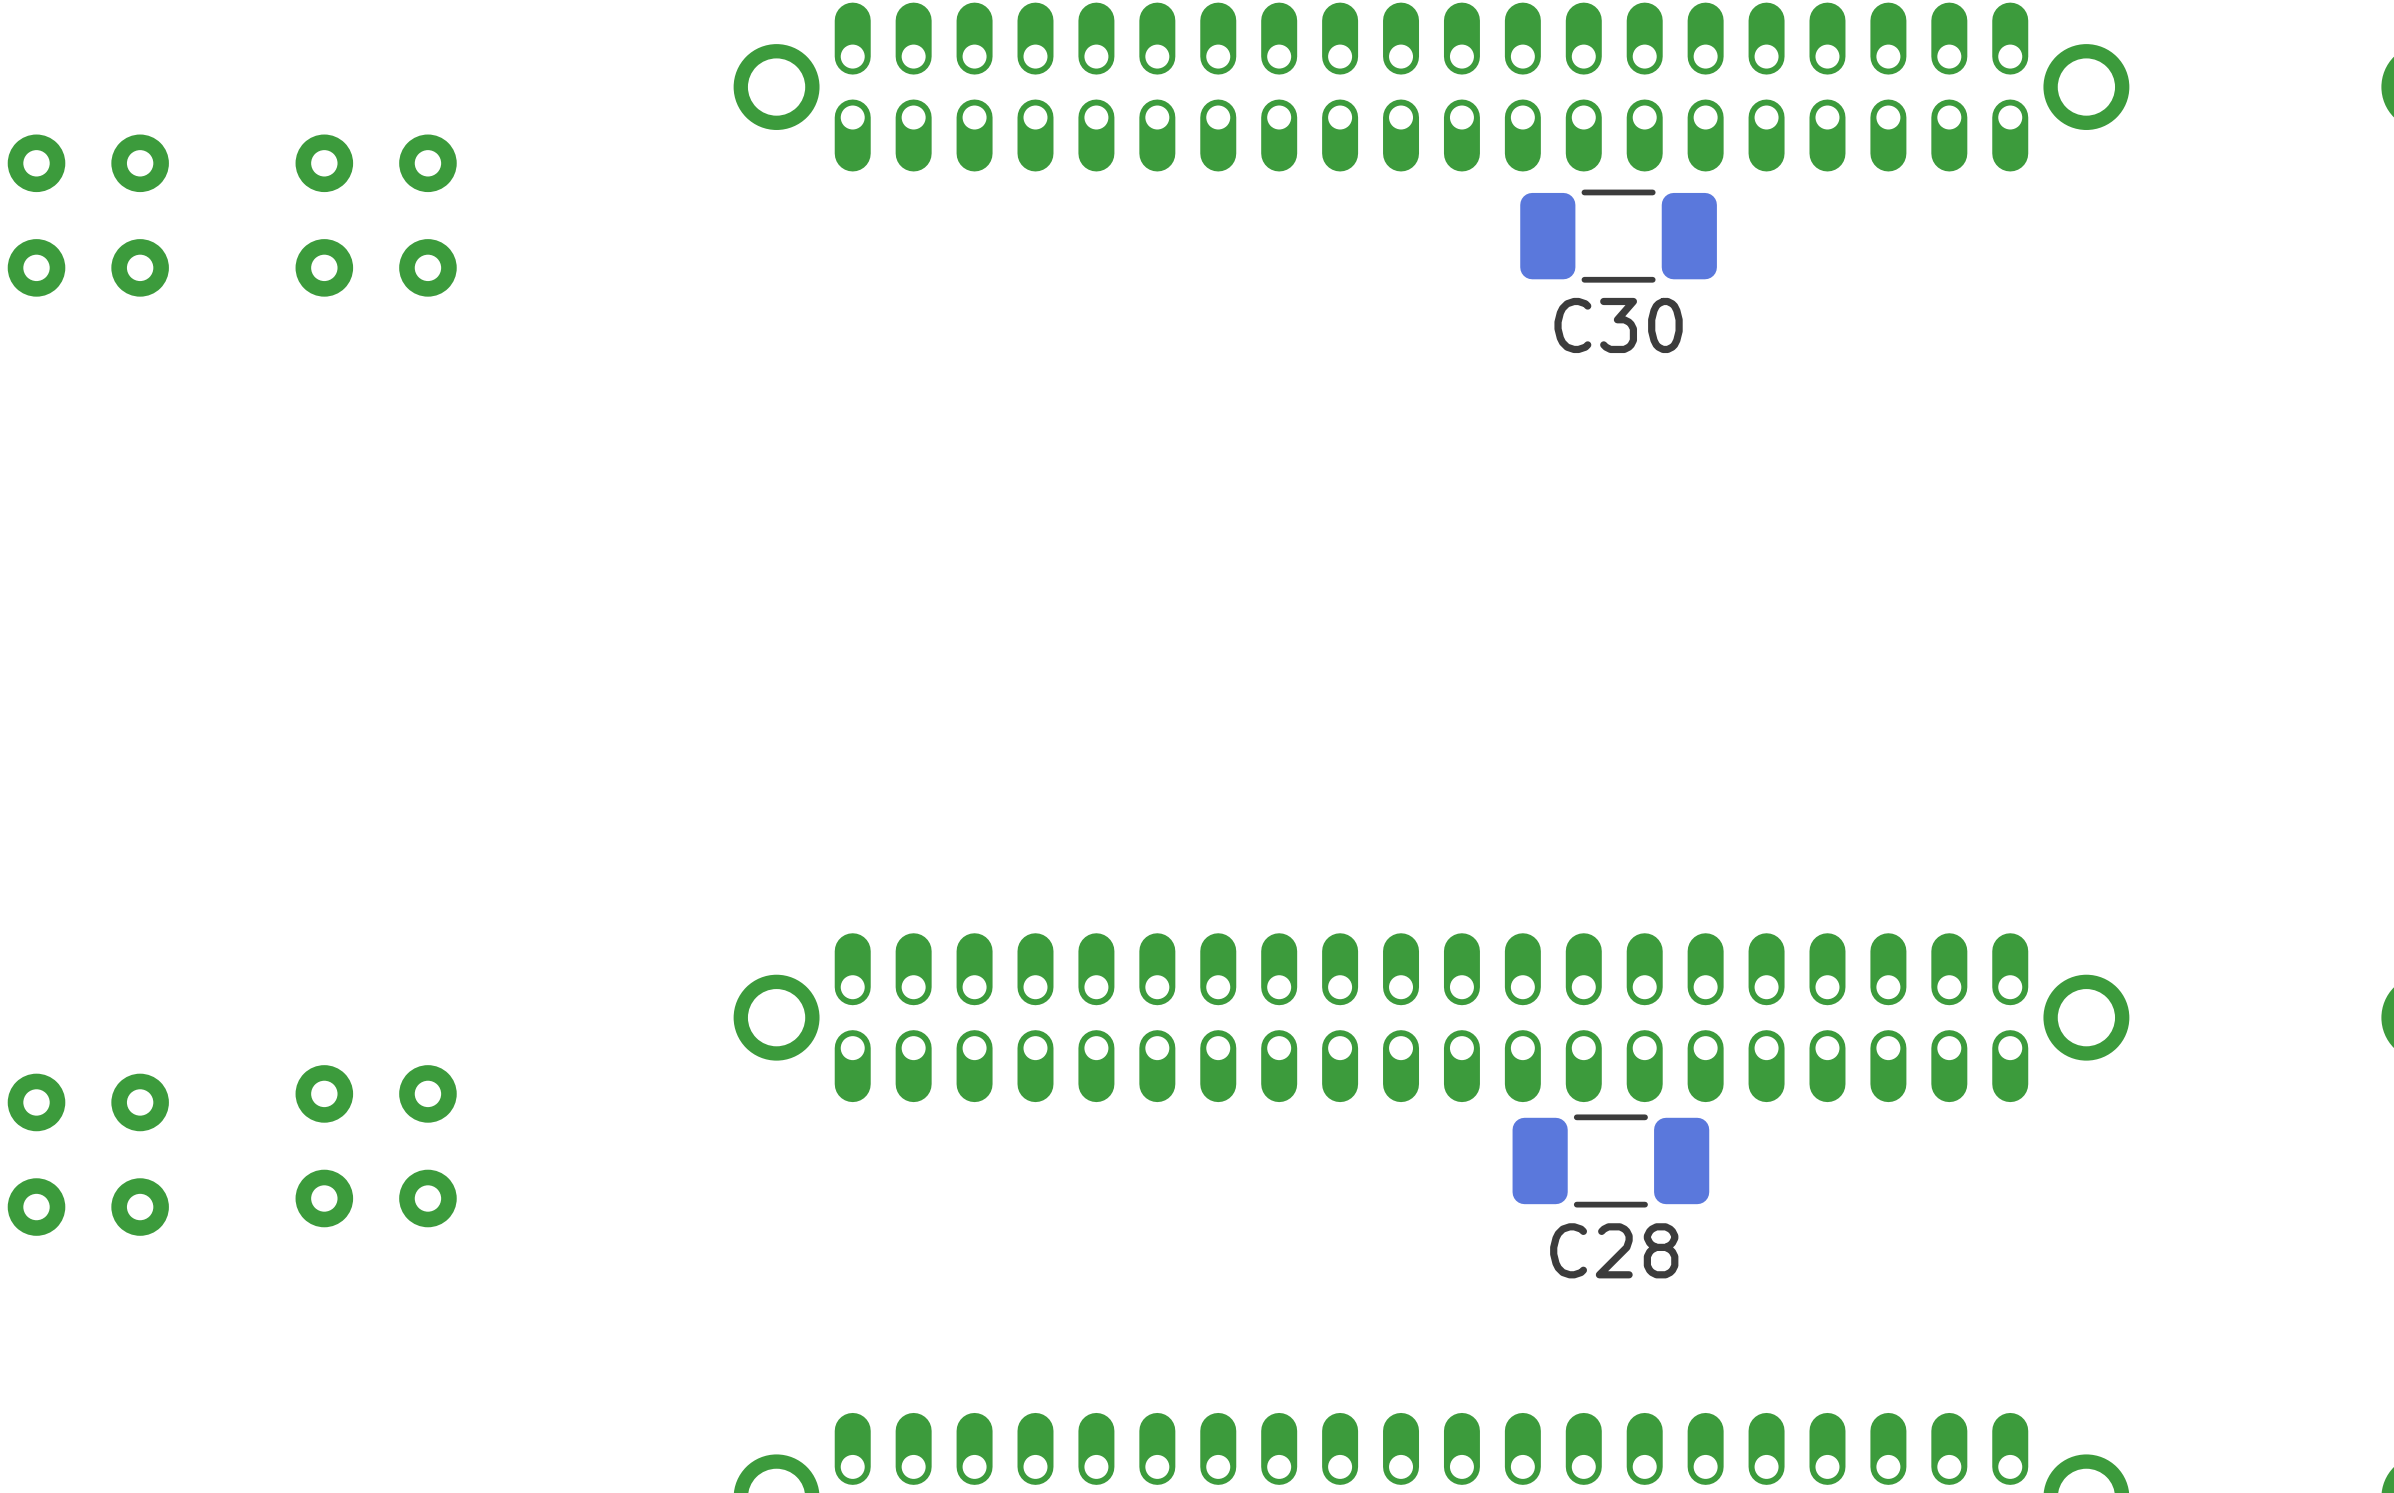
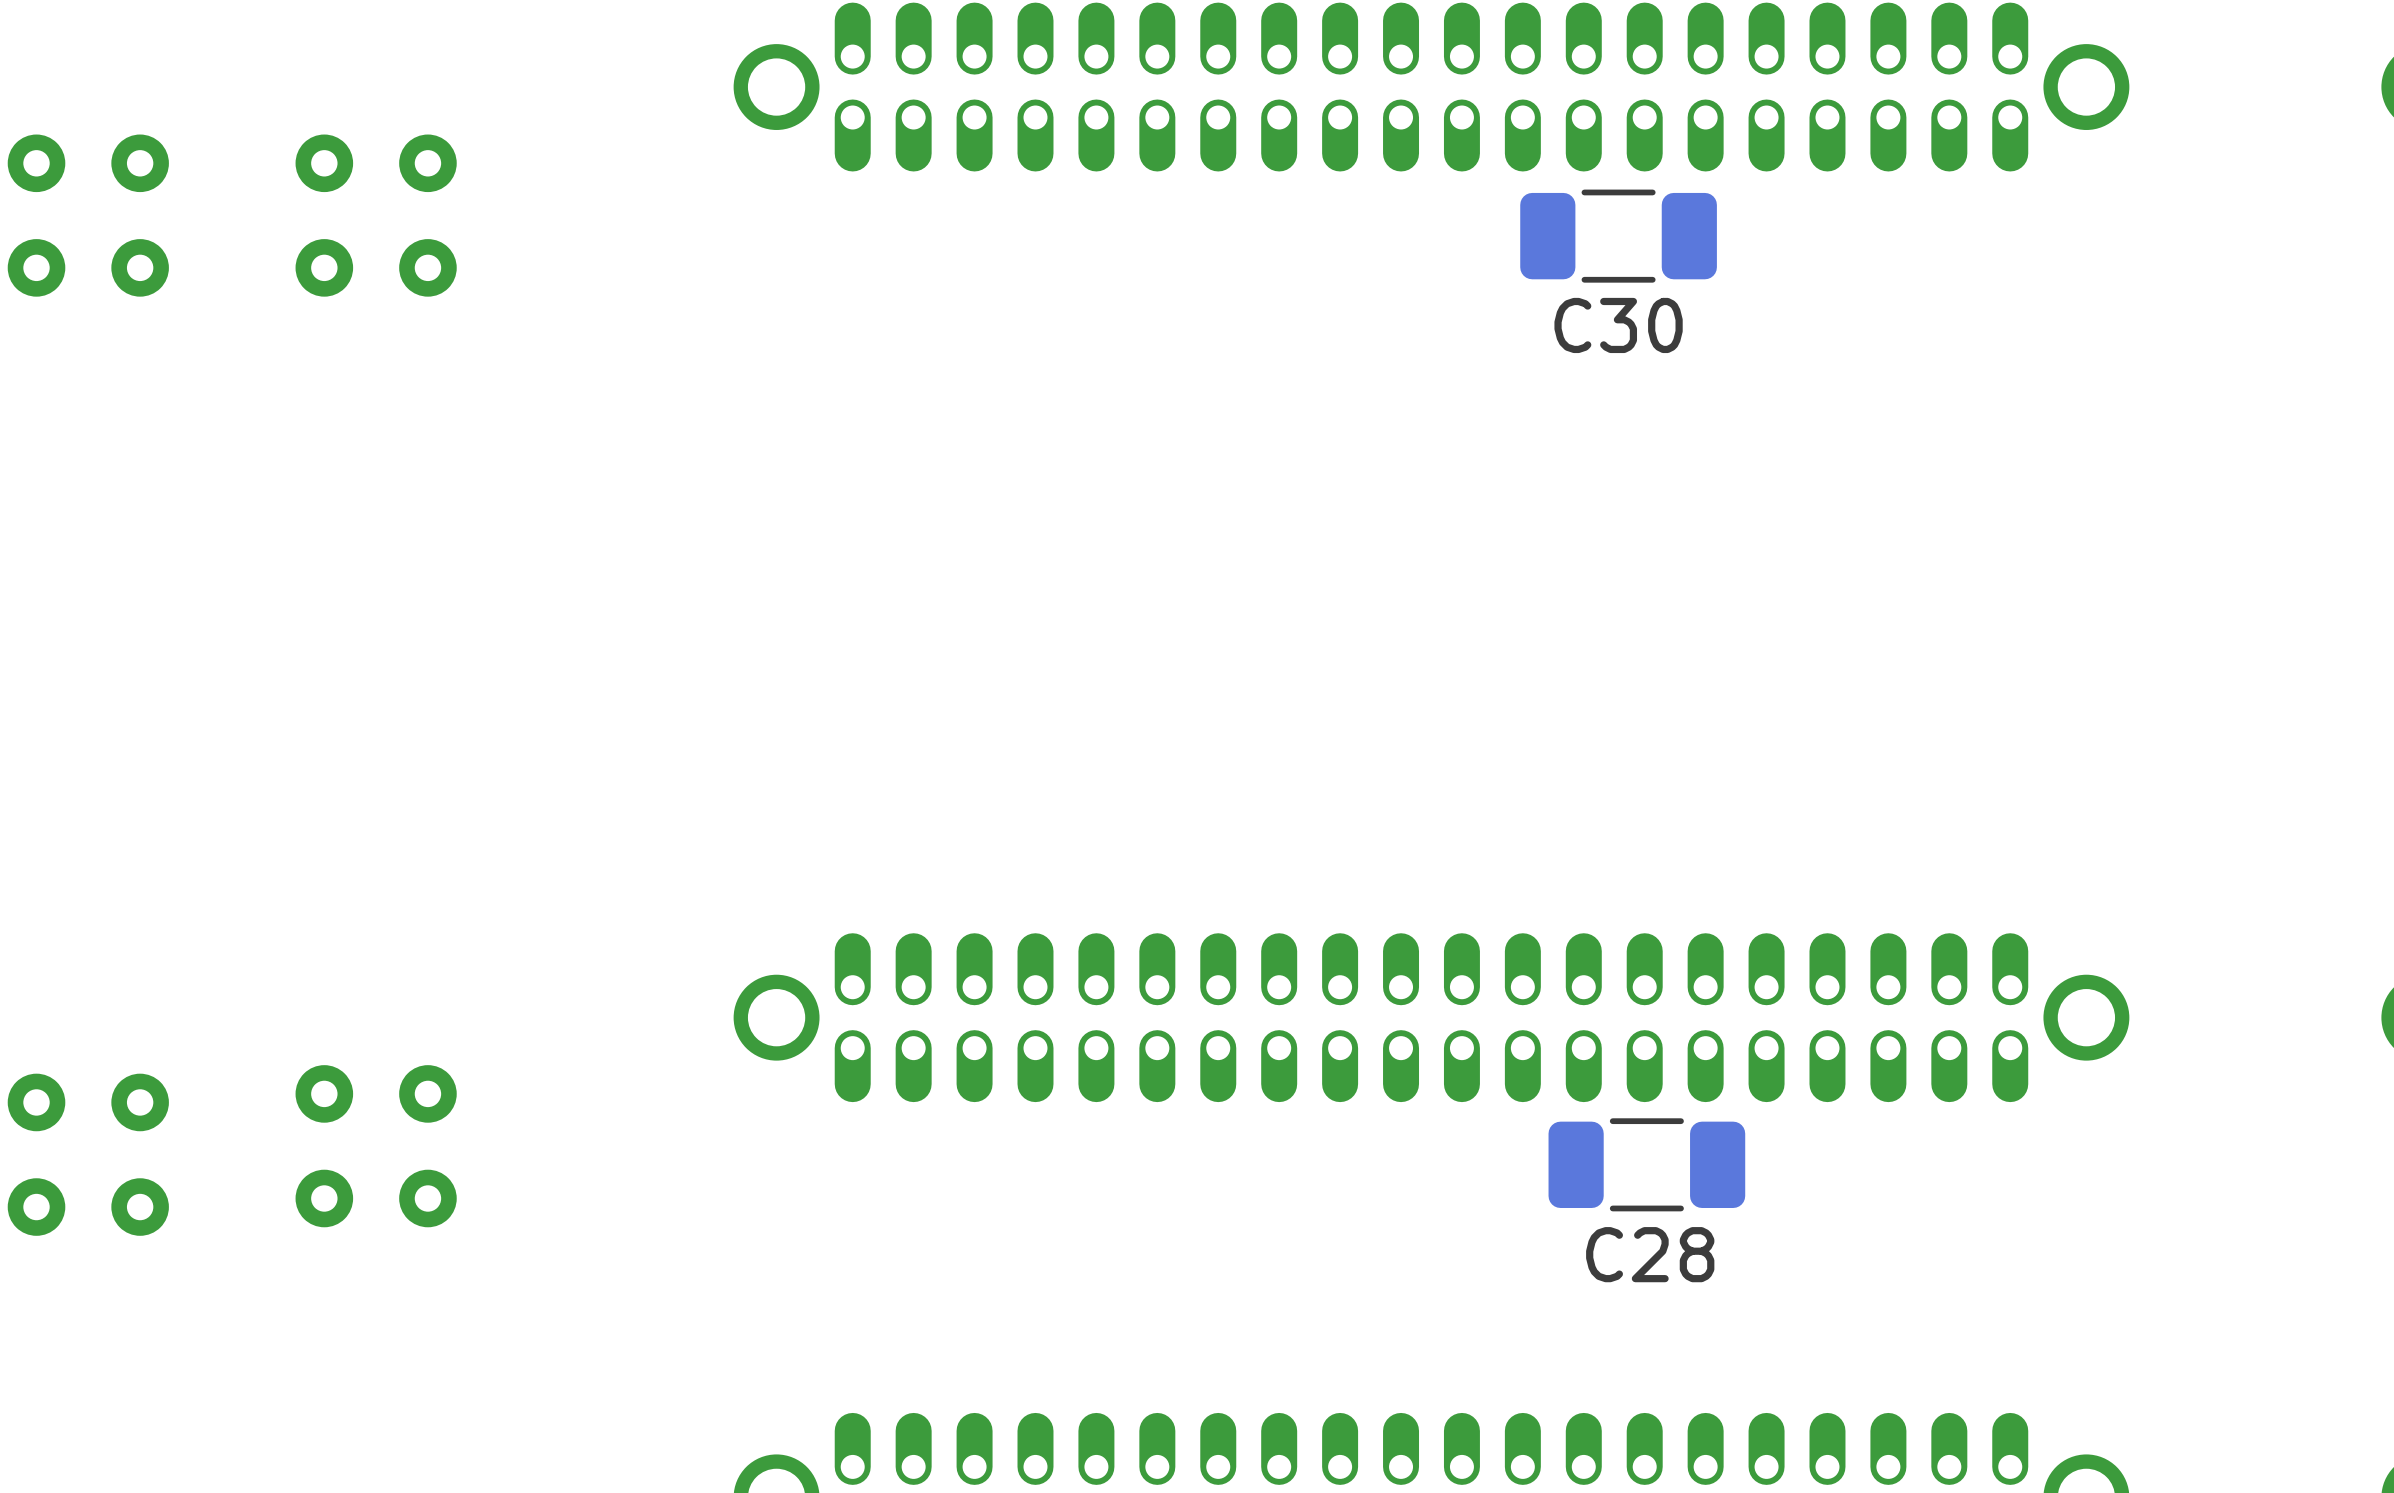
C28 position: (1610, 1160) -> (1646, 1164)

